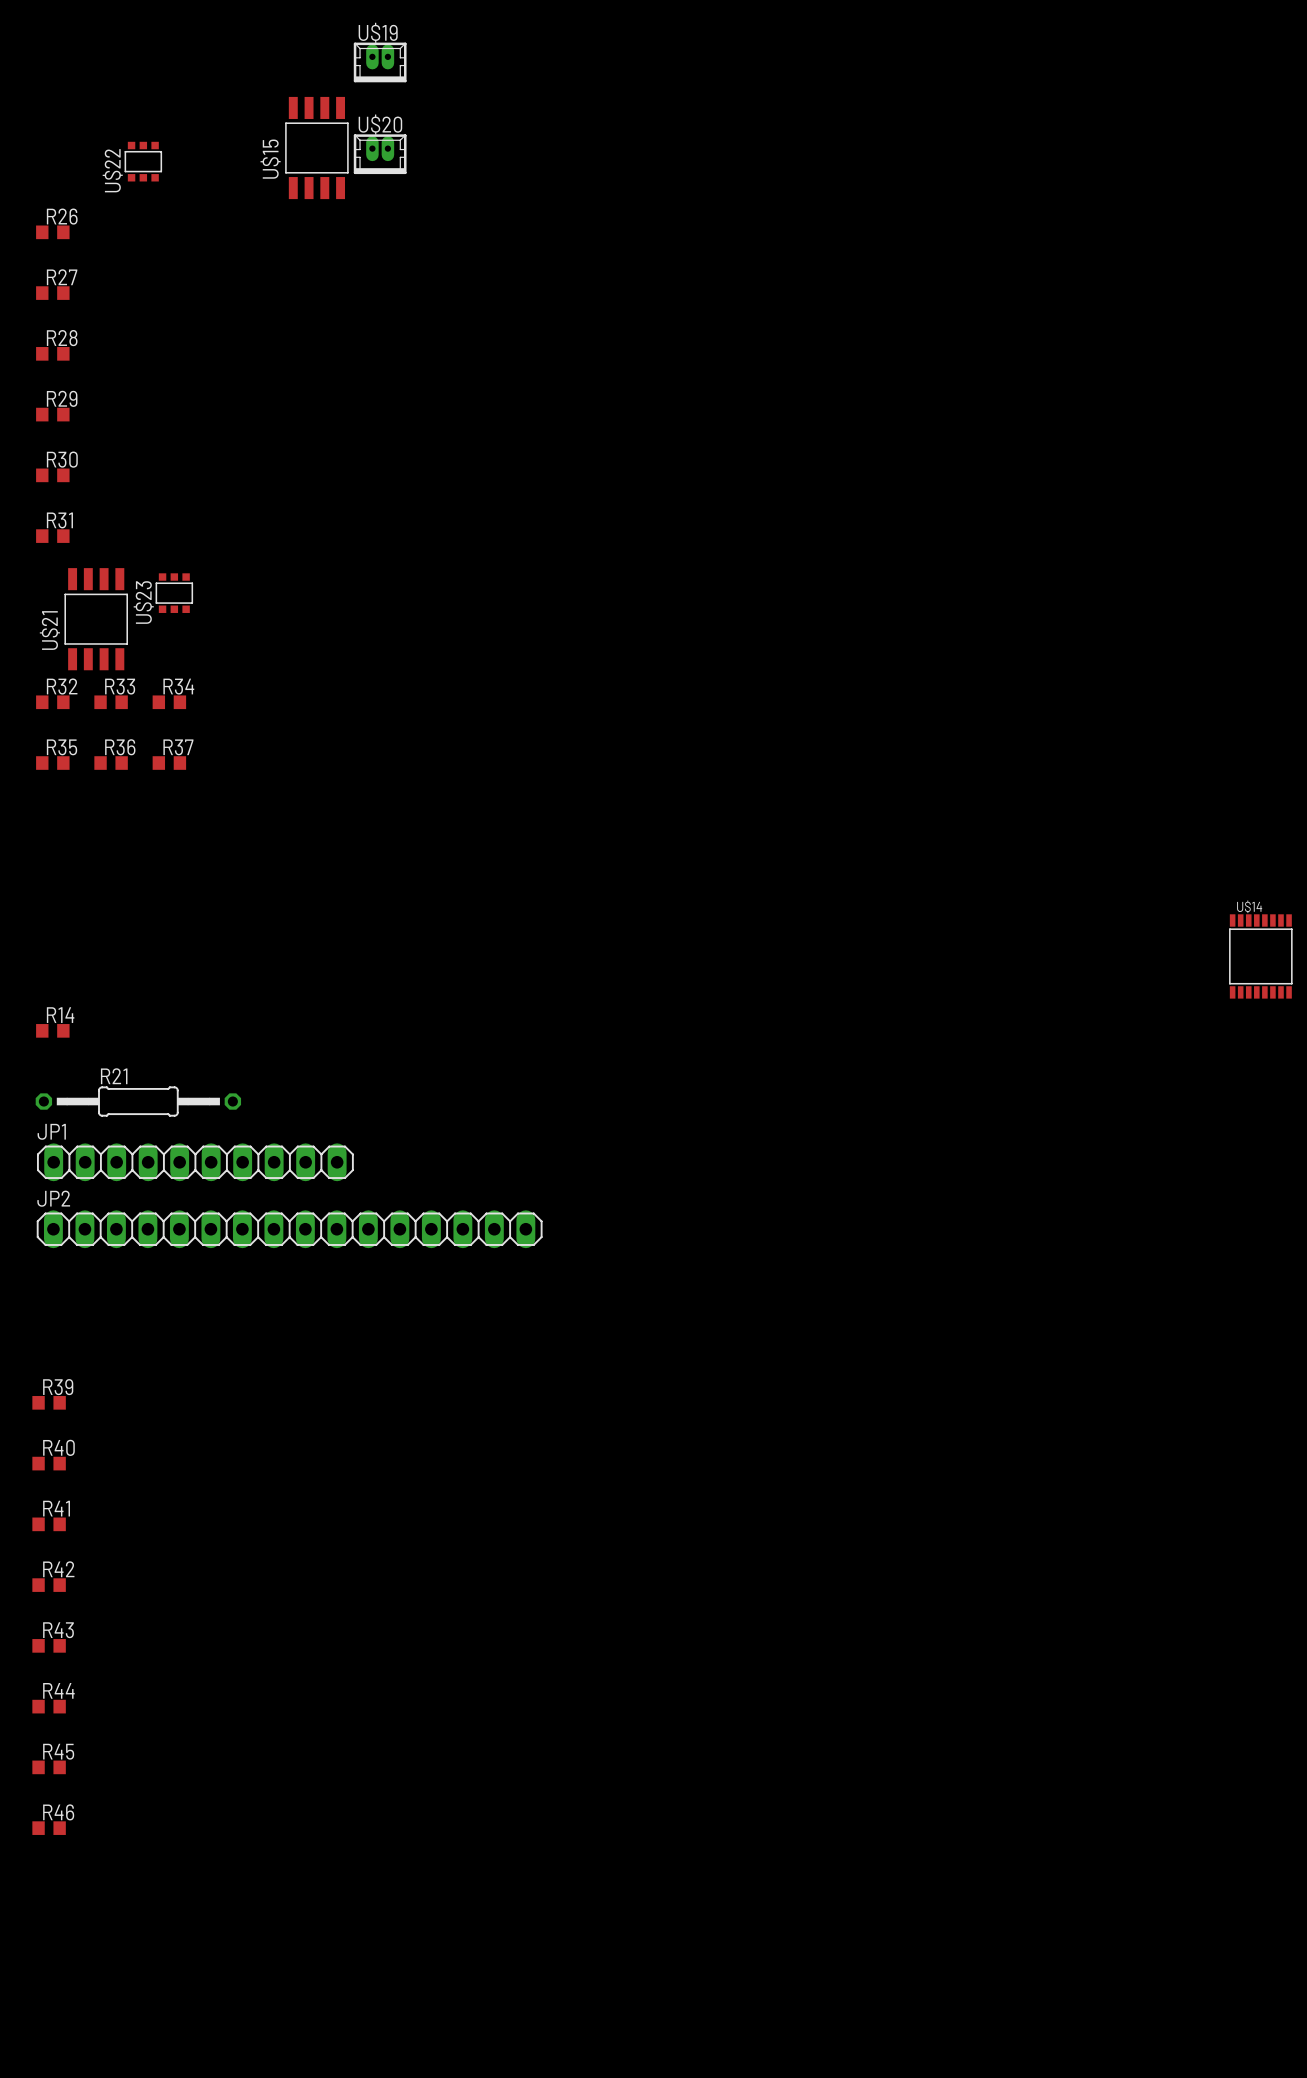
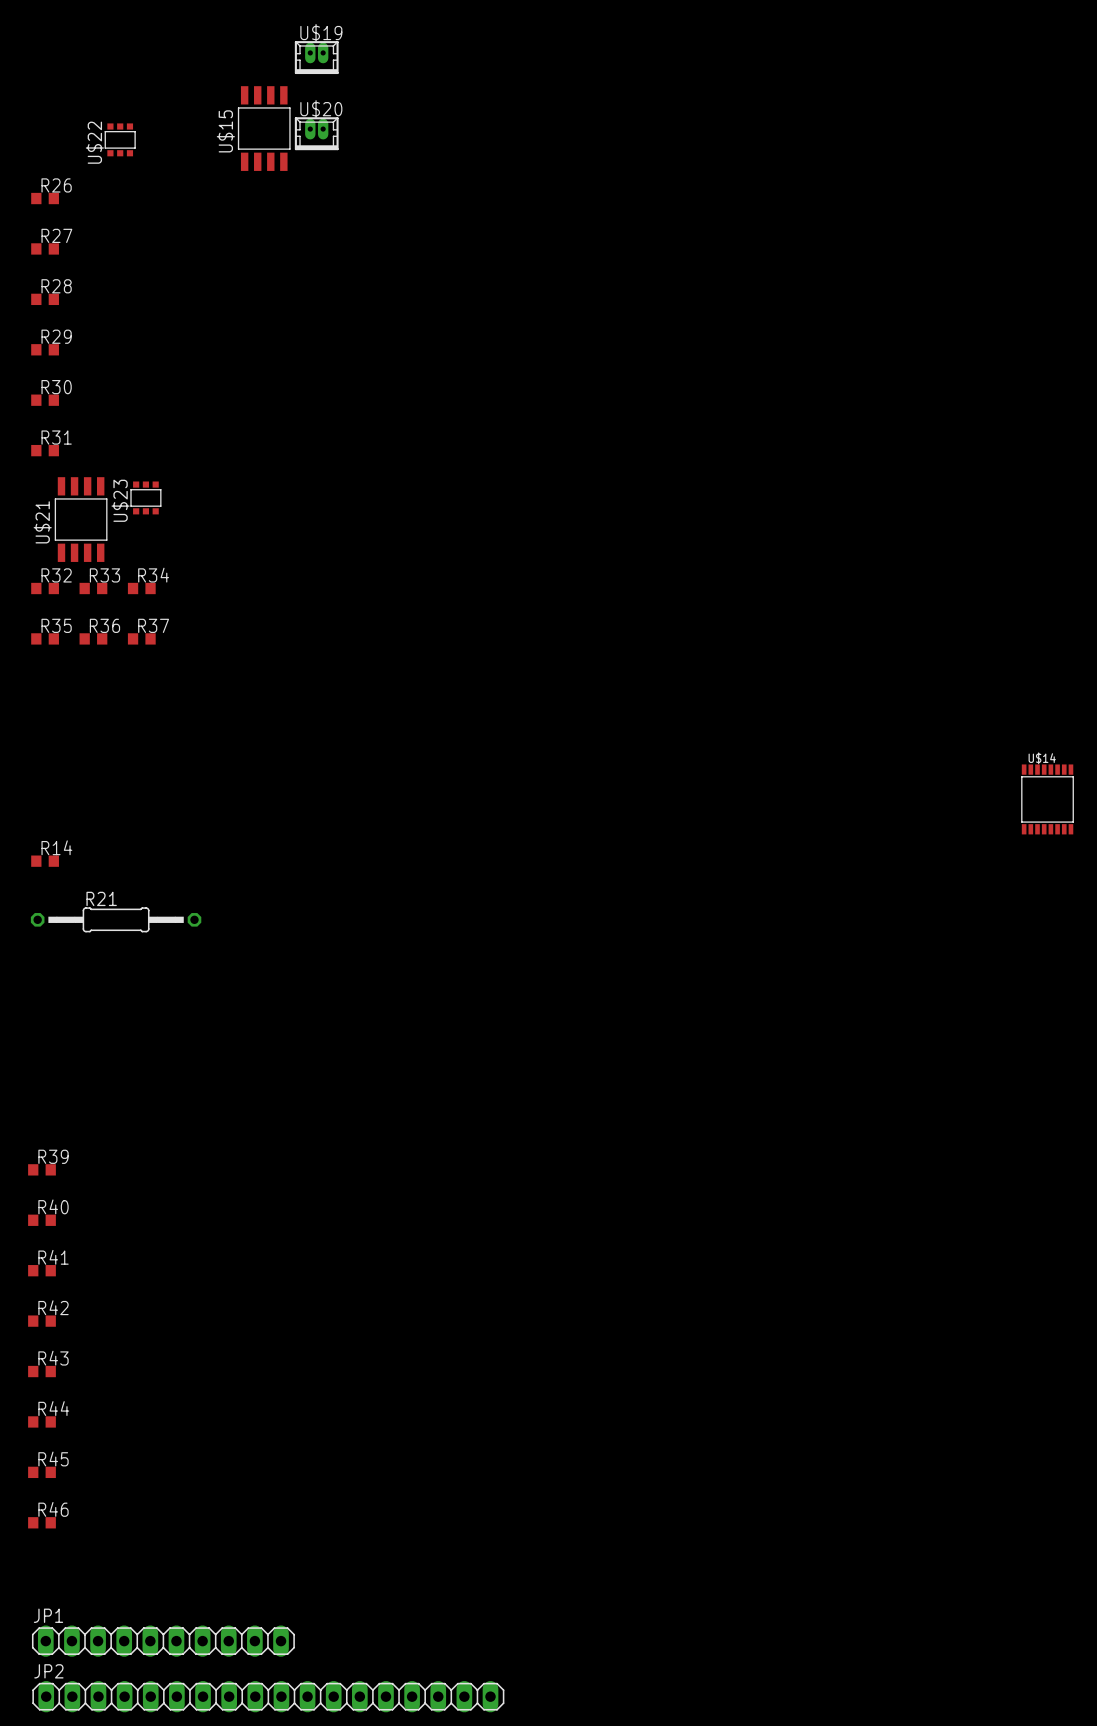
JP1 position: (195, 1162) -> (163, 1641)
JP2 name position: JP2 (53, 1198) -> JP2 (48, 1671)
JP2 footprint: [36, 1210, 543, 1249] -> [32, 1681, 505, 1713]

